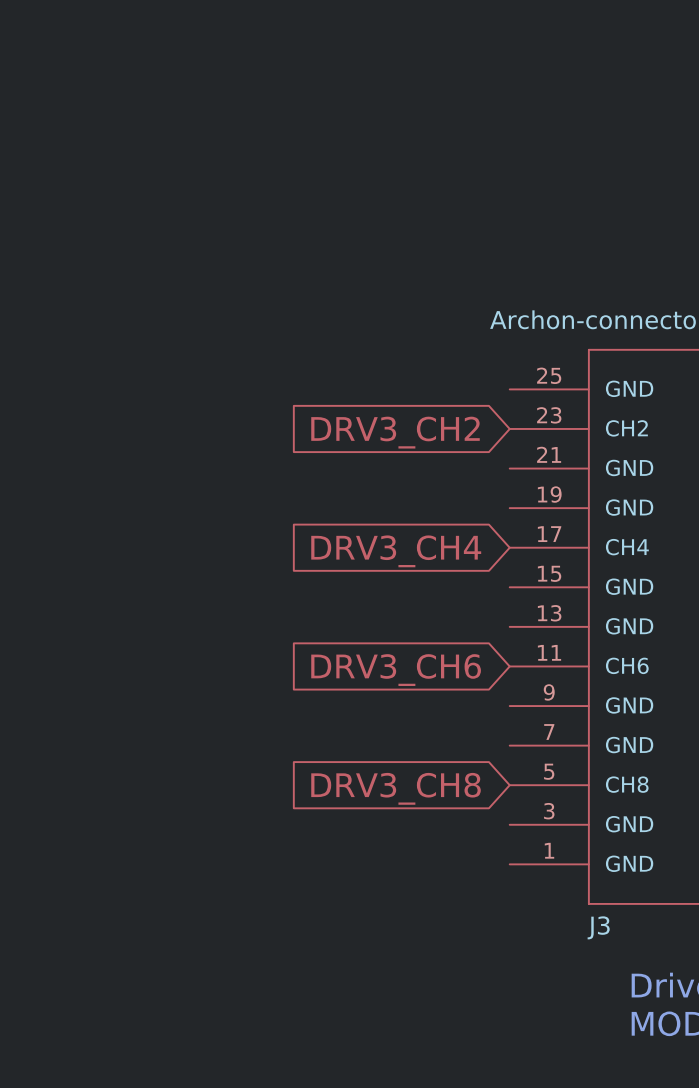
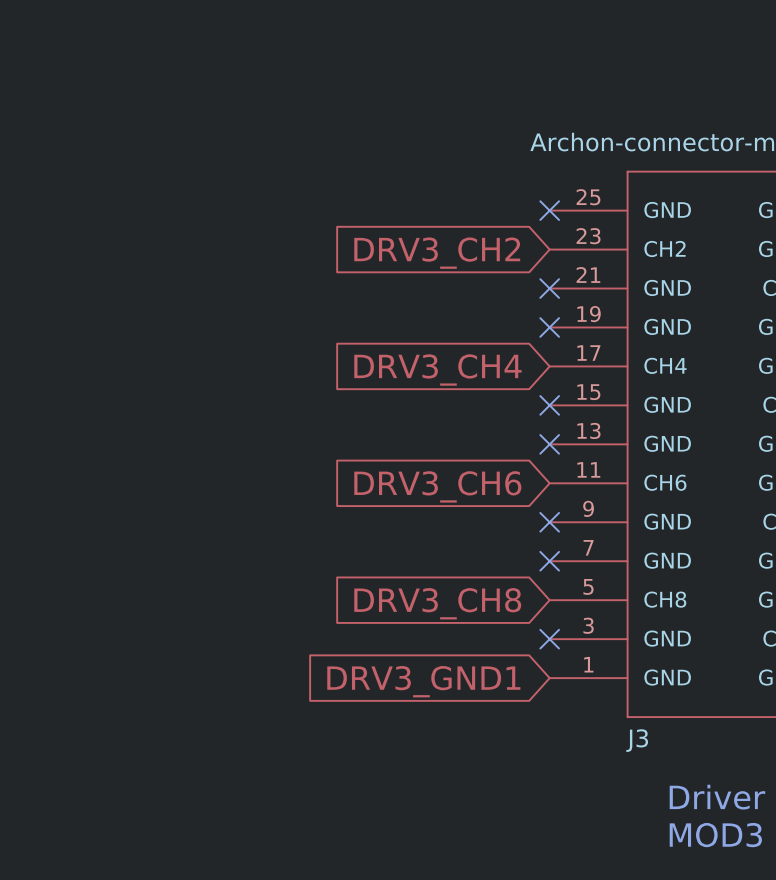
no-connect mark: none -> (549, 210)
no-connect mark: none -> (549, 288)
no-connect mark: none -> (549, 327)
no-connect mark: none -> (549, 405)
no-connect mark: none -> (549, 444)
no-connect mark: none -> (549, 522)
no-connect mark: none -> (549, 561)
no-connect mark: none -> (549, 639)
global label: none -> DRV3_GND1 (423, 681)

